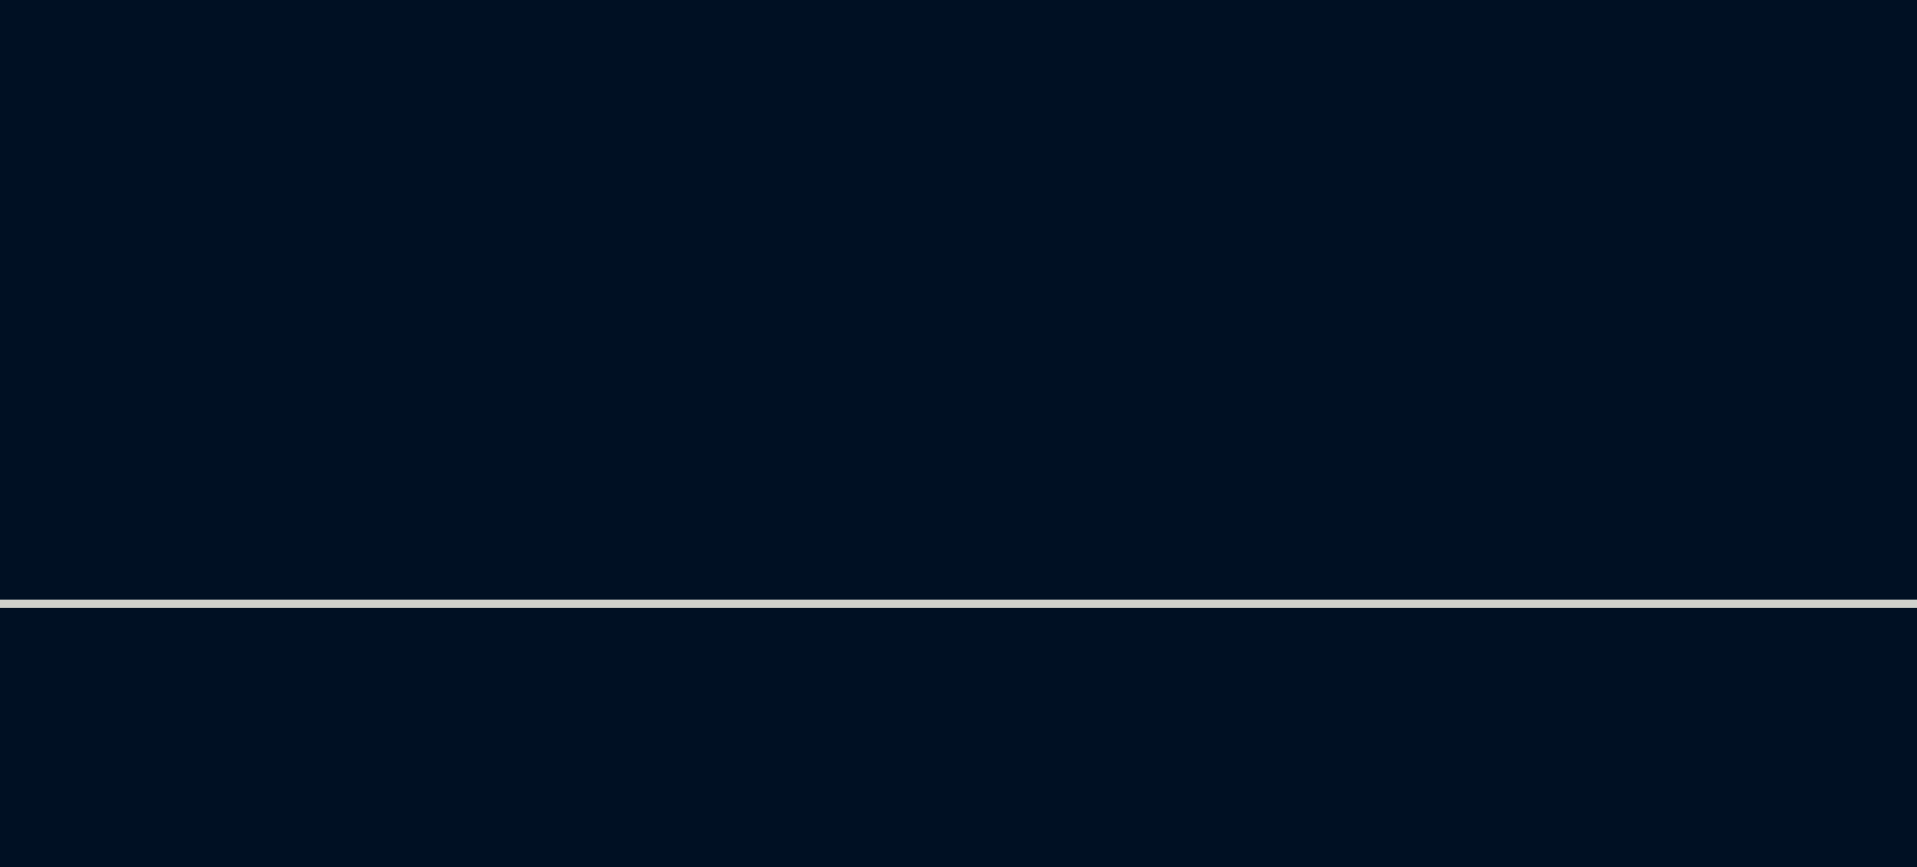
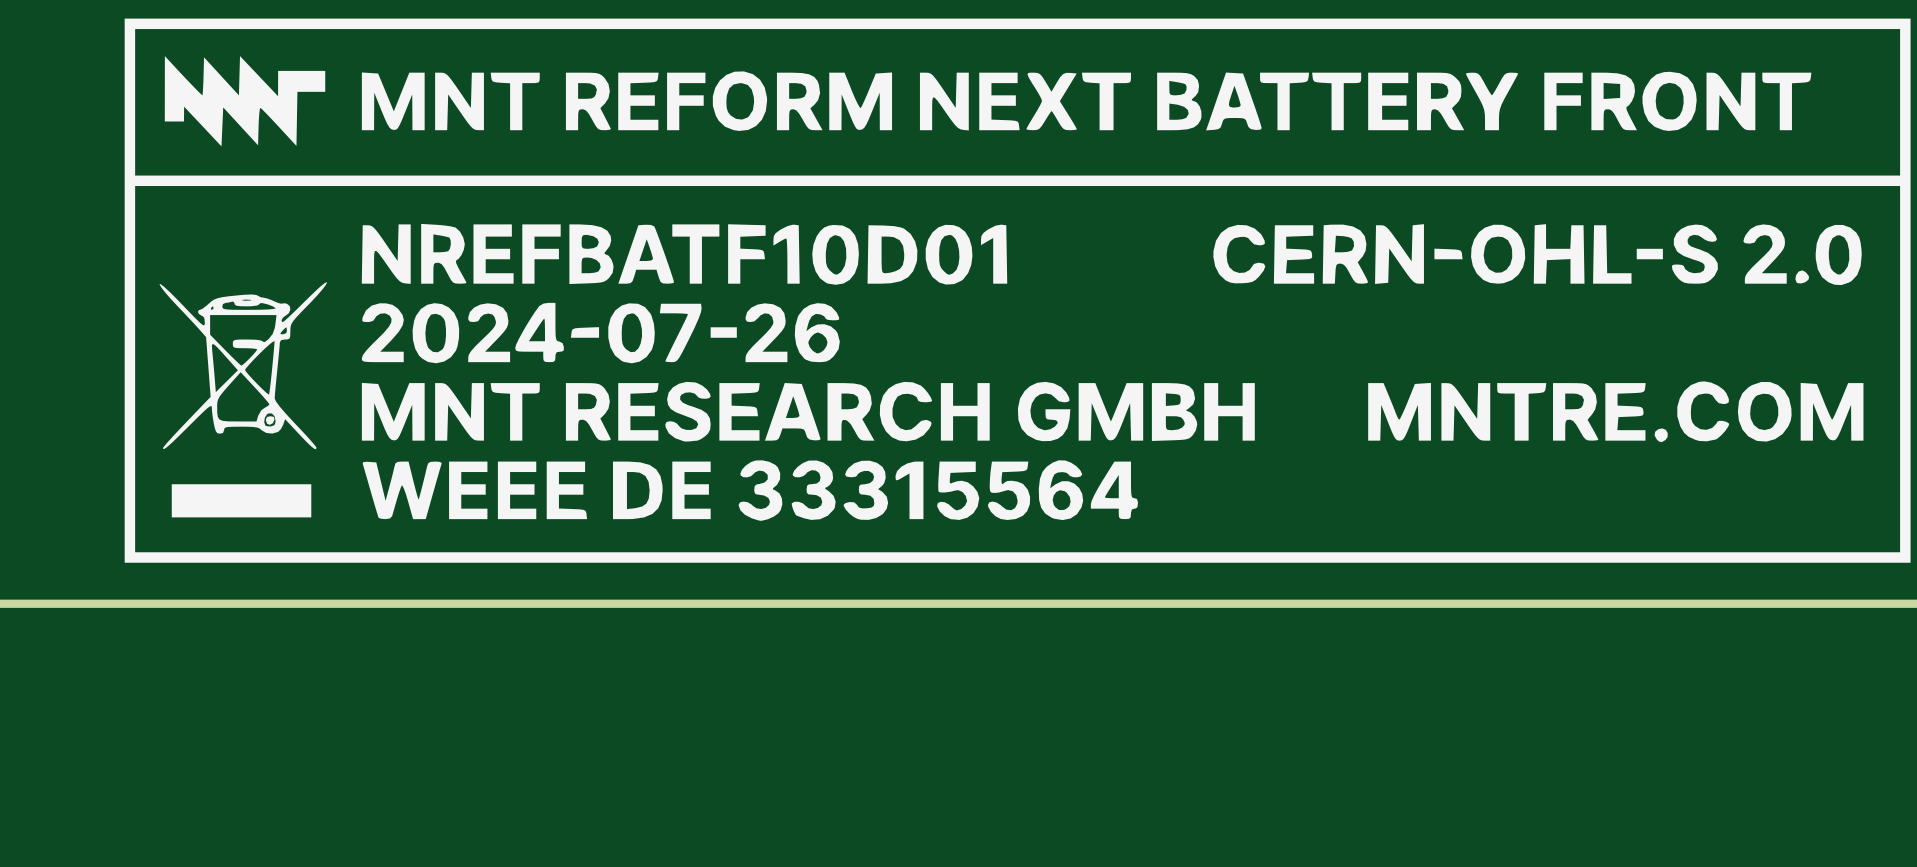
drawing: none -> [124, 18, 1911, 563]

